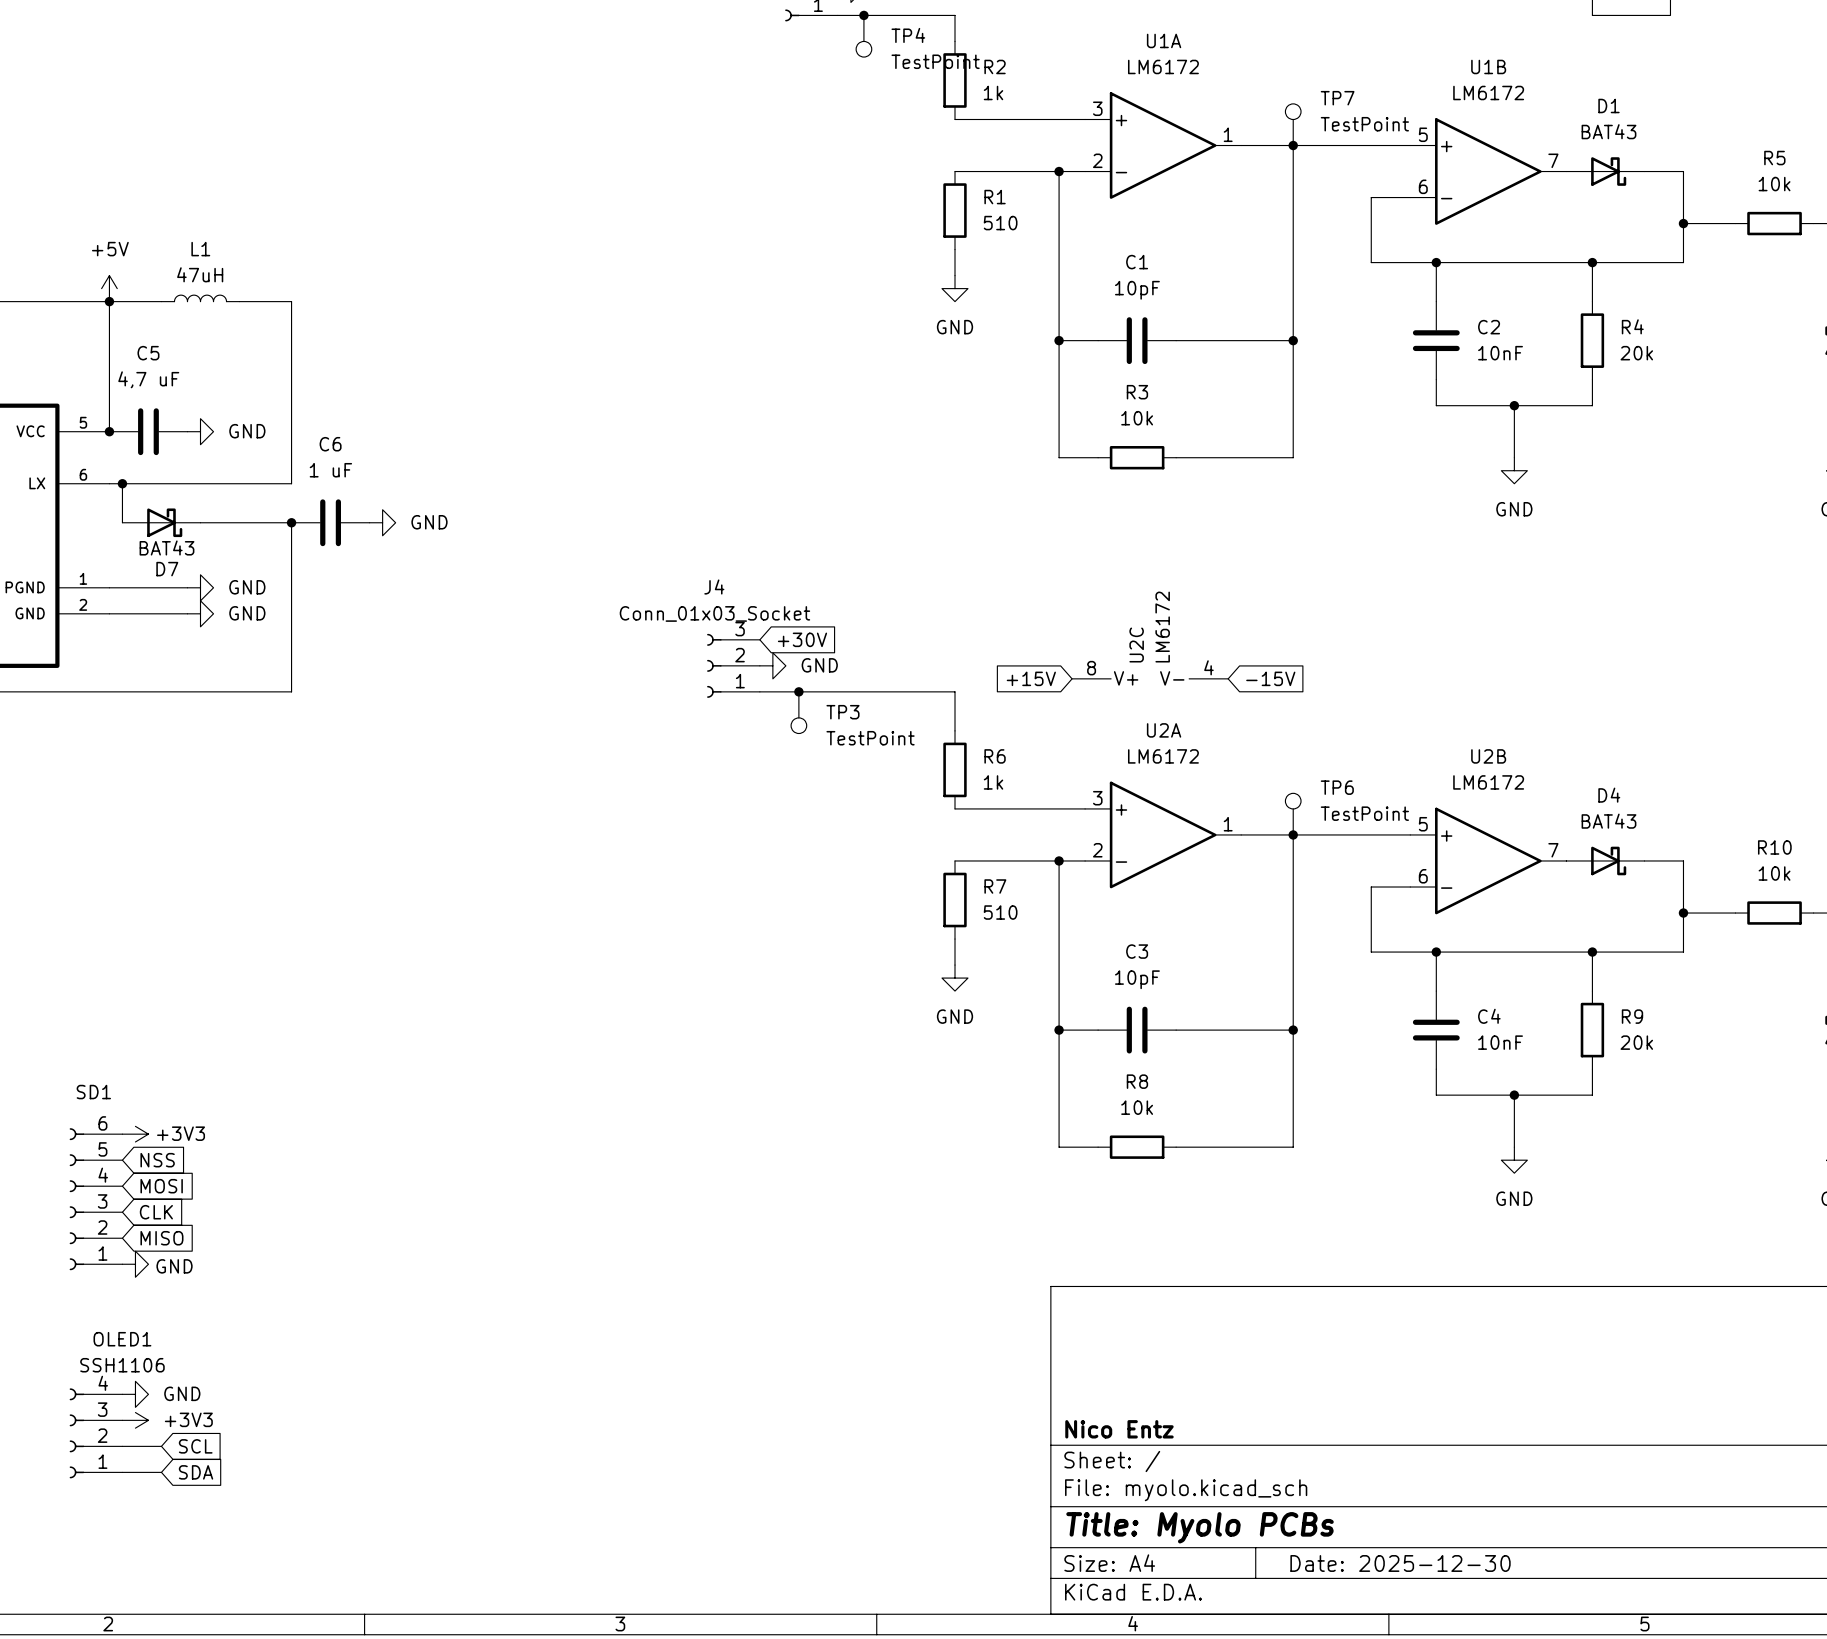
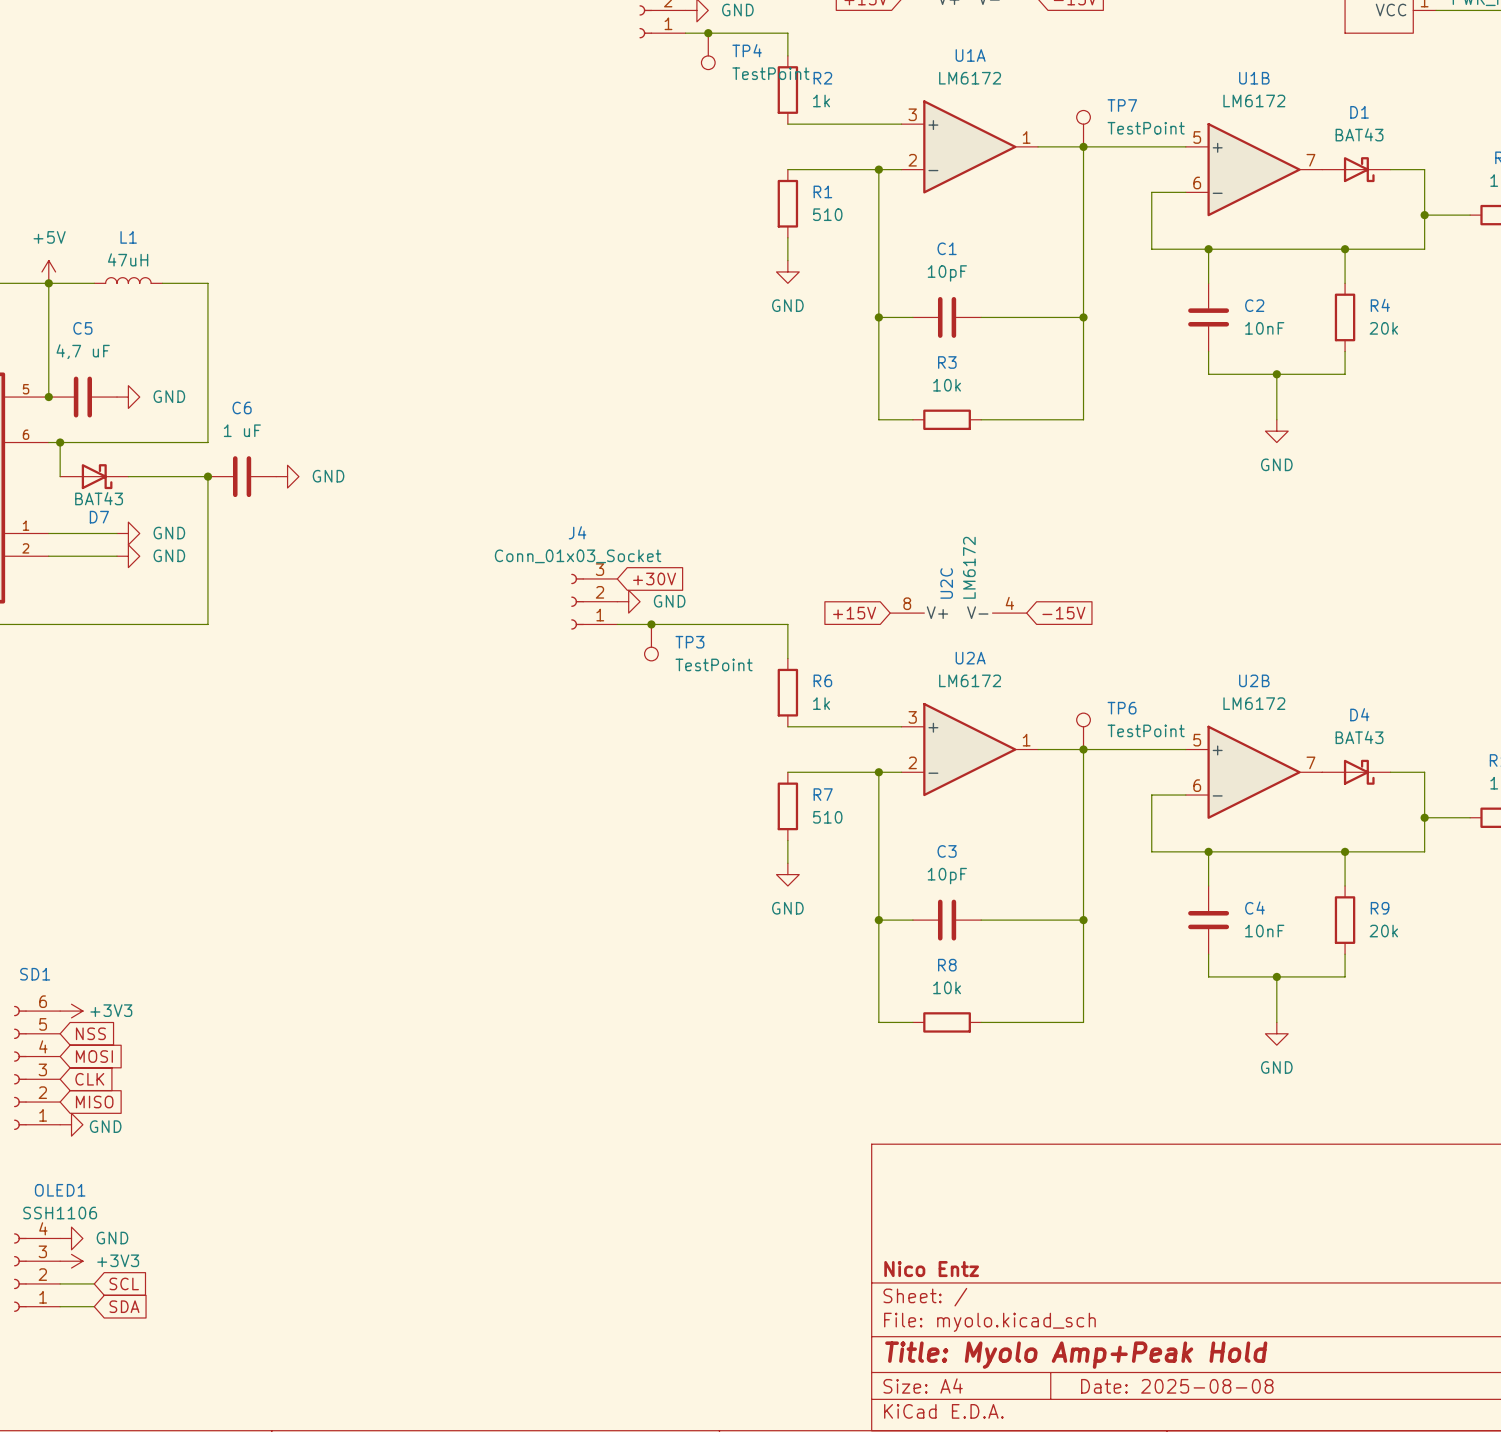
title block: Title: Myolo PCBs (1200, 1527) -> Title: Myolo Amp+Peak Hold (1076, 1355)
title block: Date: 2025-12-30 (1400, 1563) -> Date: 2025-08-08 (1177, 1386)

